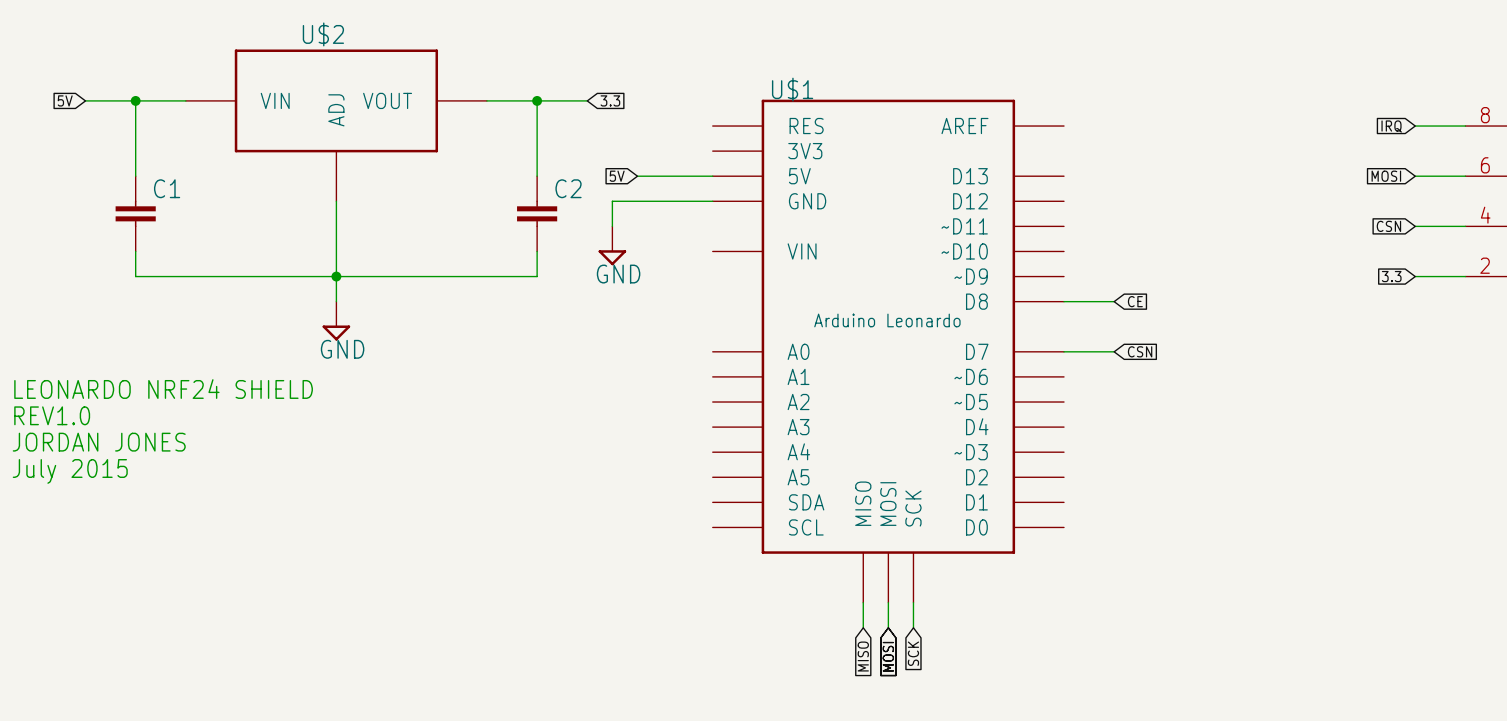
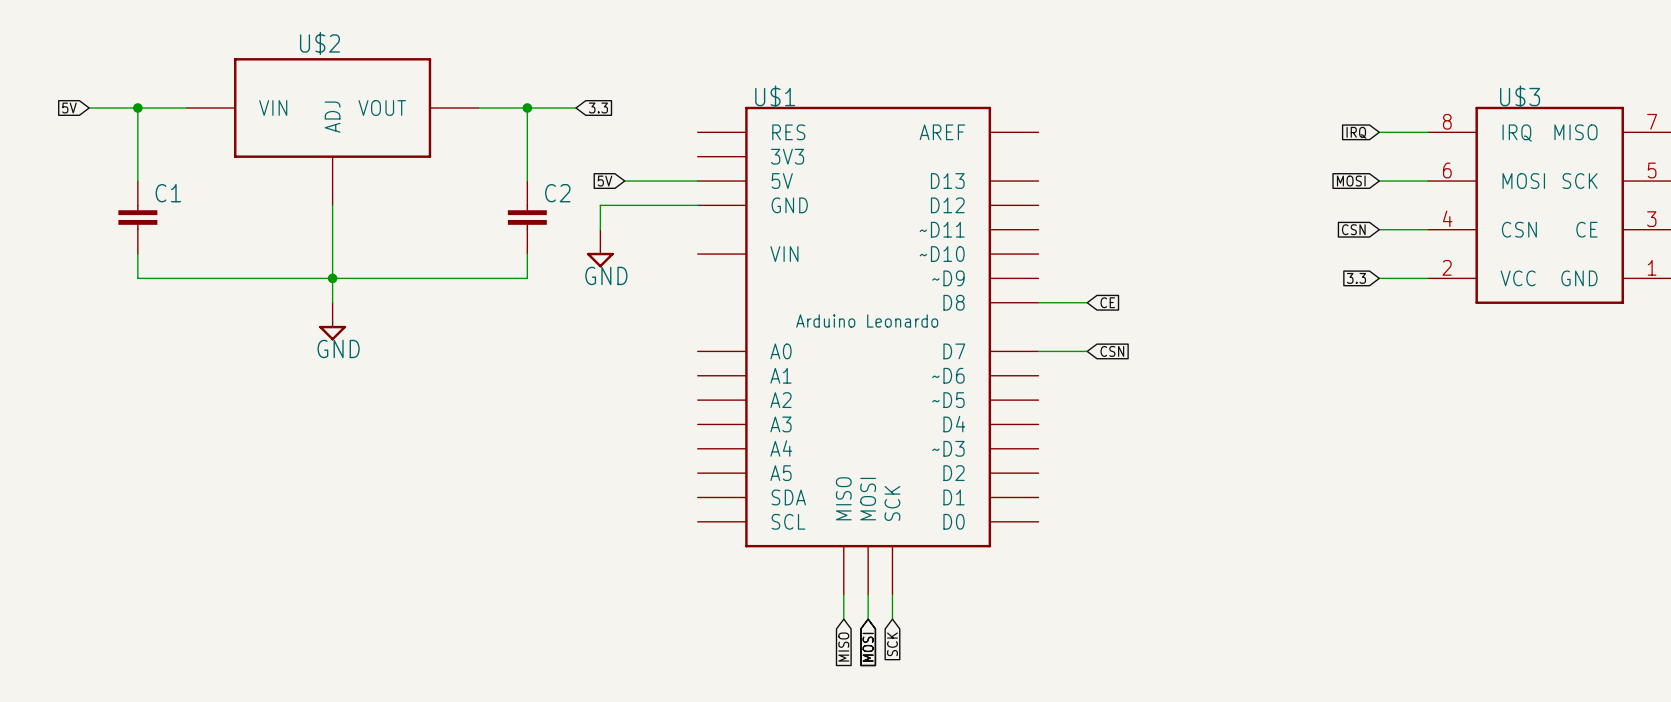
text: LEONARDO NRF24 SHIELD (163, 389) -> none
text: REV1.0 (52, 415) -> none
text: JORDAN JONES (99, 442) -> none
text: July 2015 (70, 471) -> none

